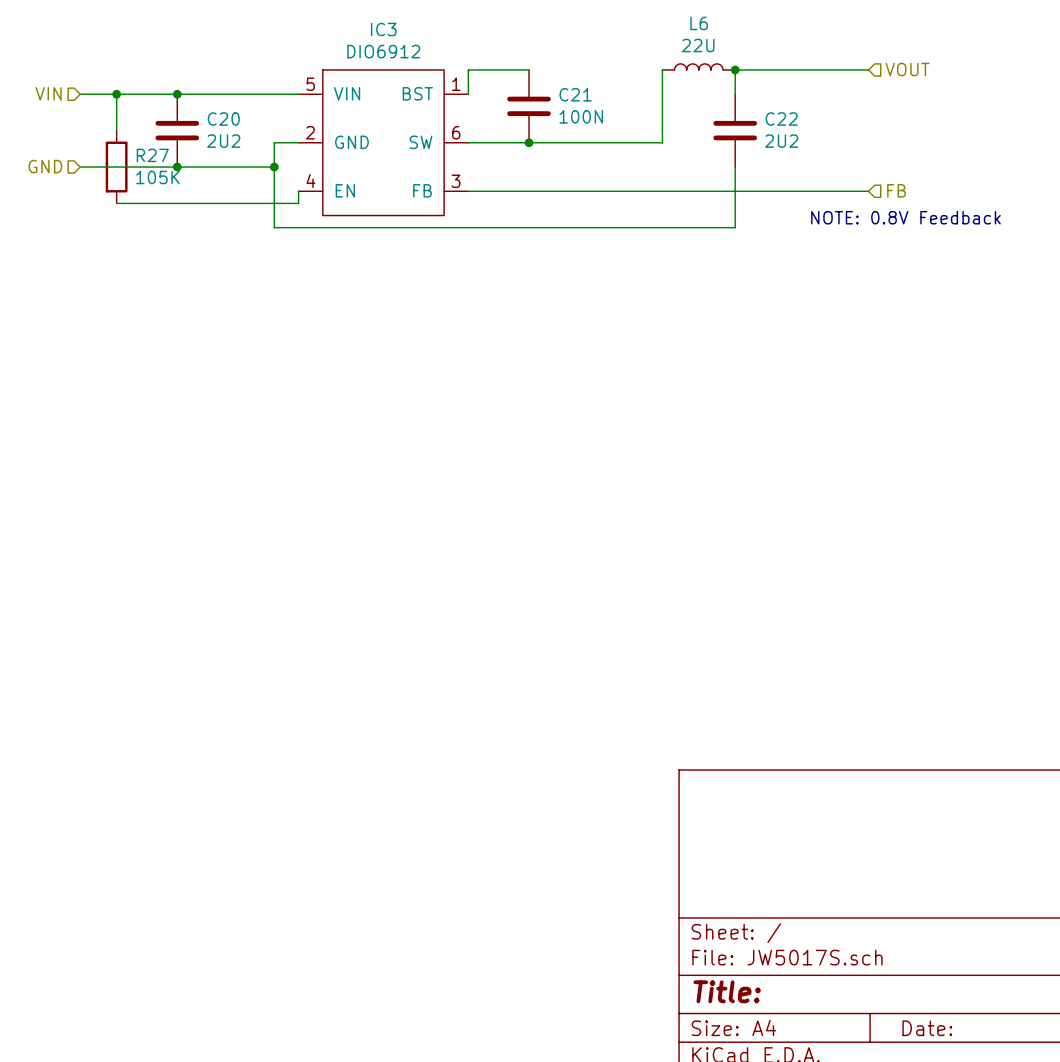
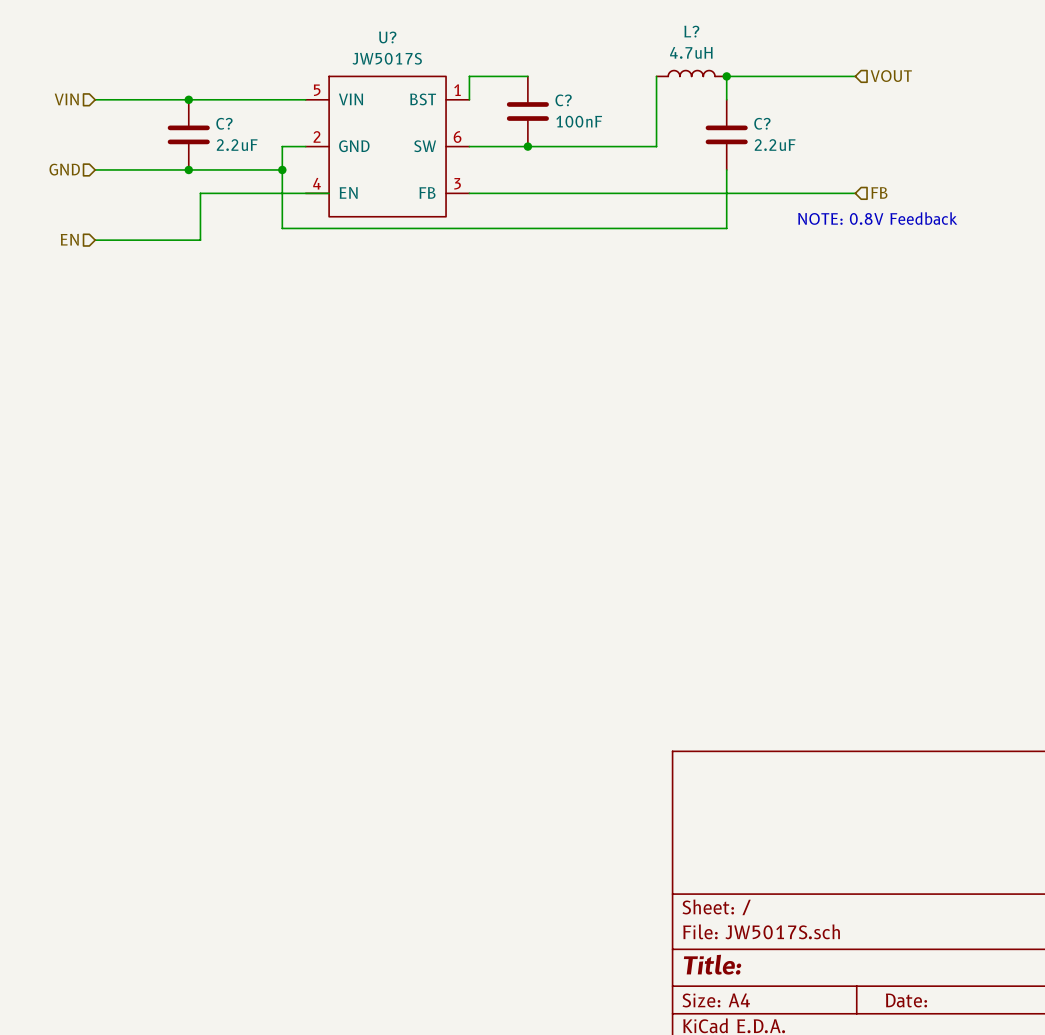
L6 name: L6 (699, 23) -> L? (691, 31)
IC3 name: IC3 (383, 29) -> U? (387, 37)
L6 value: 22U (698, 45) -> 4.7uH (691, 52)
IC3 value: DIO6912 (383, 51) -> JW5017S (387, 58)
wire: (116, 94) (116, 130) -> none
junction: (116, 94) -> none
C21 name: C21 (575, 94) -> C? (563, 100)
C21 value: 100N (581, 116) -> 100nF (579, 121)
C20 name: C20 (223, 119) -> C? (224, 123)
C22 name: C22 (781, 119) -> C? (762, 123)
C20 value: 2U2 (223, 141) -> 2.2uF (237, 145)
C22 value: 2U2 (781, 141) -> 2.2uF (775, 145)
R27: 105K (116, 167) -> none
wire: (298, 191) (298, 203) (116, 203) -> none
wire: none -> (329, 193) (200, 193) (200, 240) (95, 240)
hierarchical label: none -> EN (69, 239)

